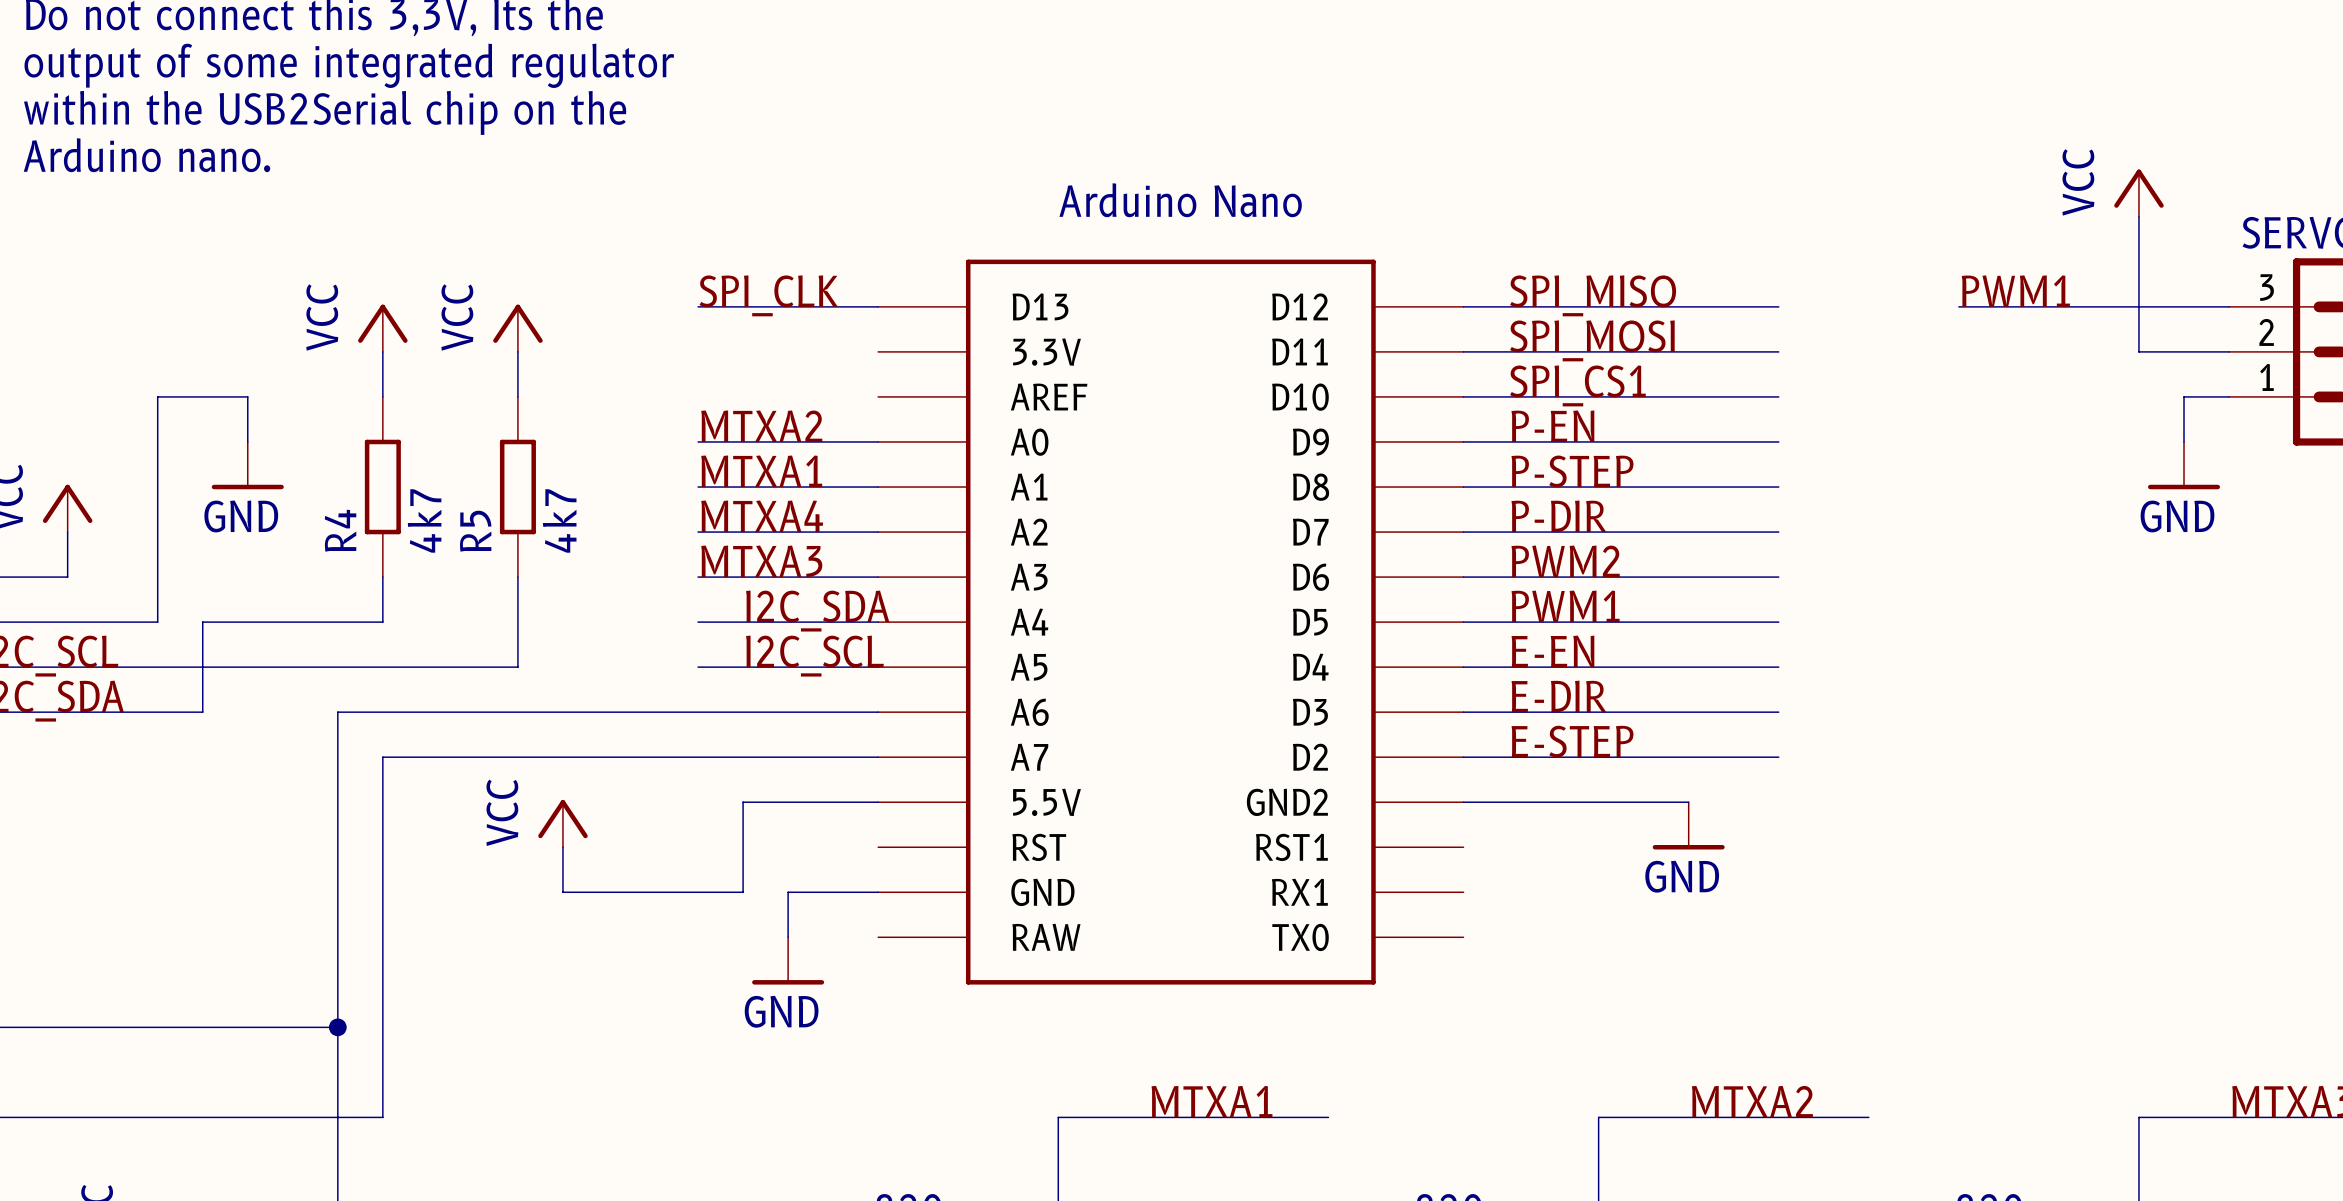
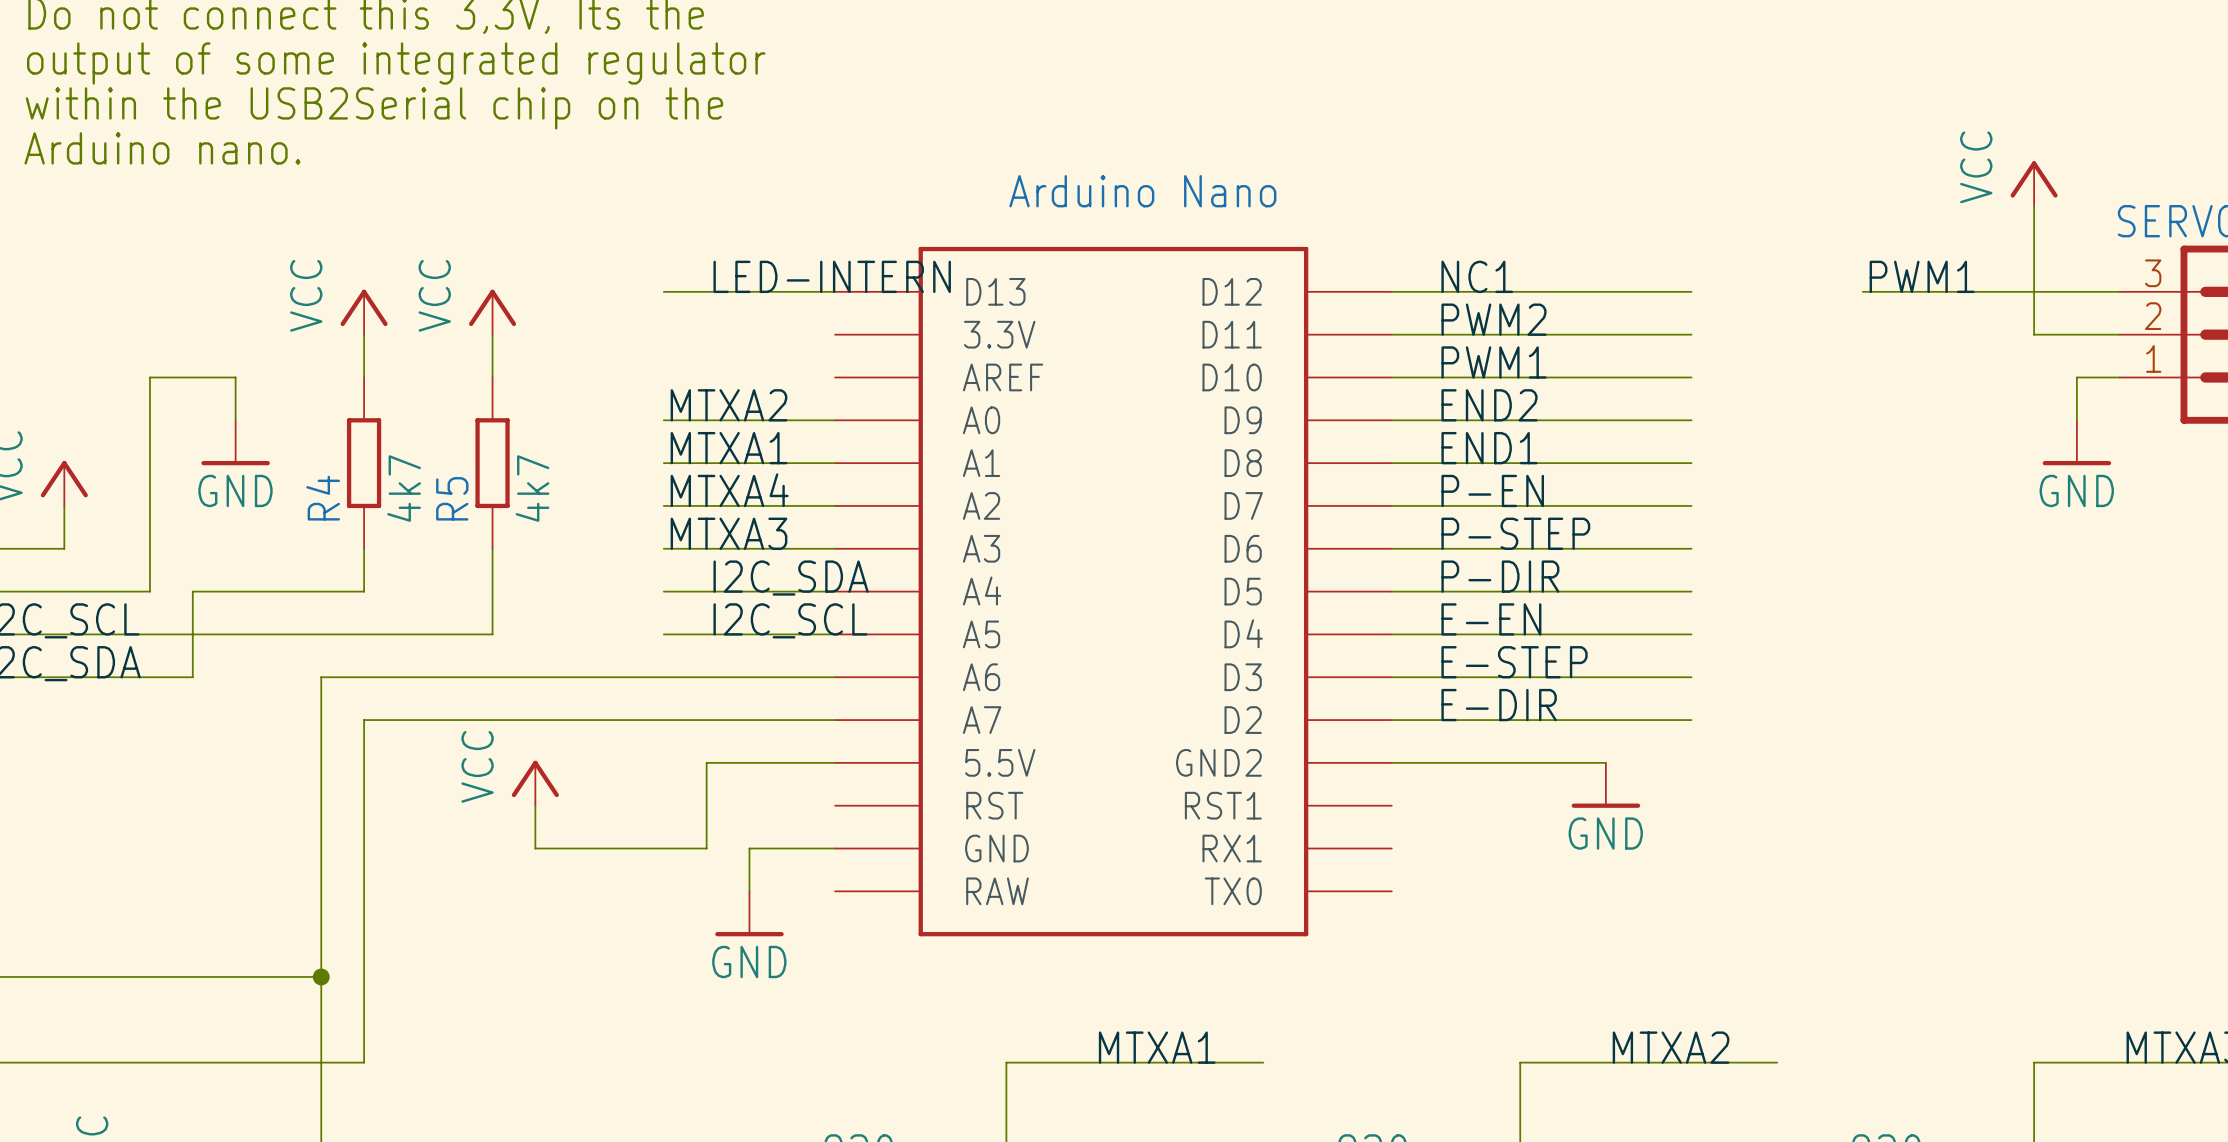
label: none -> LED-INTERN (832, 276)
label: SPI_CLK (768, 295) -> none
label: SPI_MISO (1593, 295) -> NC1 (1477, 276)
label: SPI_MOSI (1592, 340) -> PWM2 (1493, 319)
label: SPI_CS1 (1577, 385) -> PWM1 (1493, 362)
label: P-EN (1552, 426) -> END2 (1489, 405)
label: P-STEP (1572, 471) -> END1 (1489, 448)
label: P-DIR (1558, 516) -> P-EN (1492, 490)
label: PWM2 (1565, 561) -> P-STEP (1515, 533)
label: PWM1 (1565, 606) -> P-DIR (1500, 576)
label: E-DIR (1558, 696) -> E-STEP (1514, 662)
label: E-STEP (1572, 741) -> E-DIR (1499, 705)

